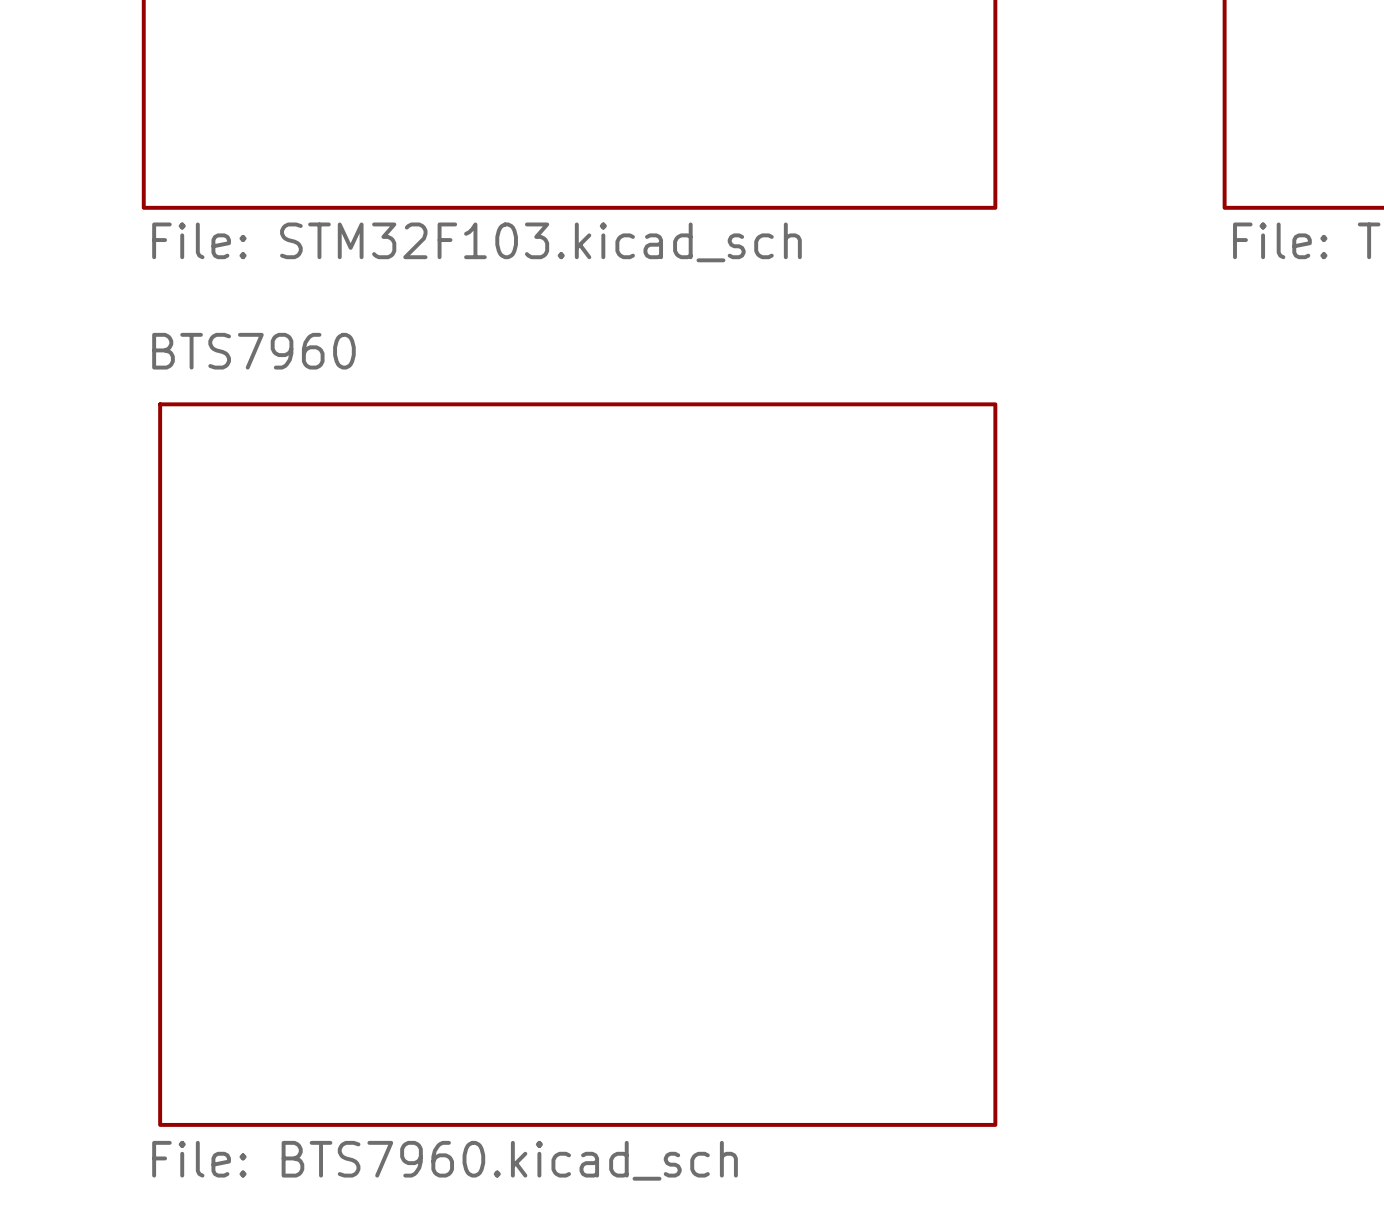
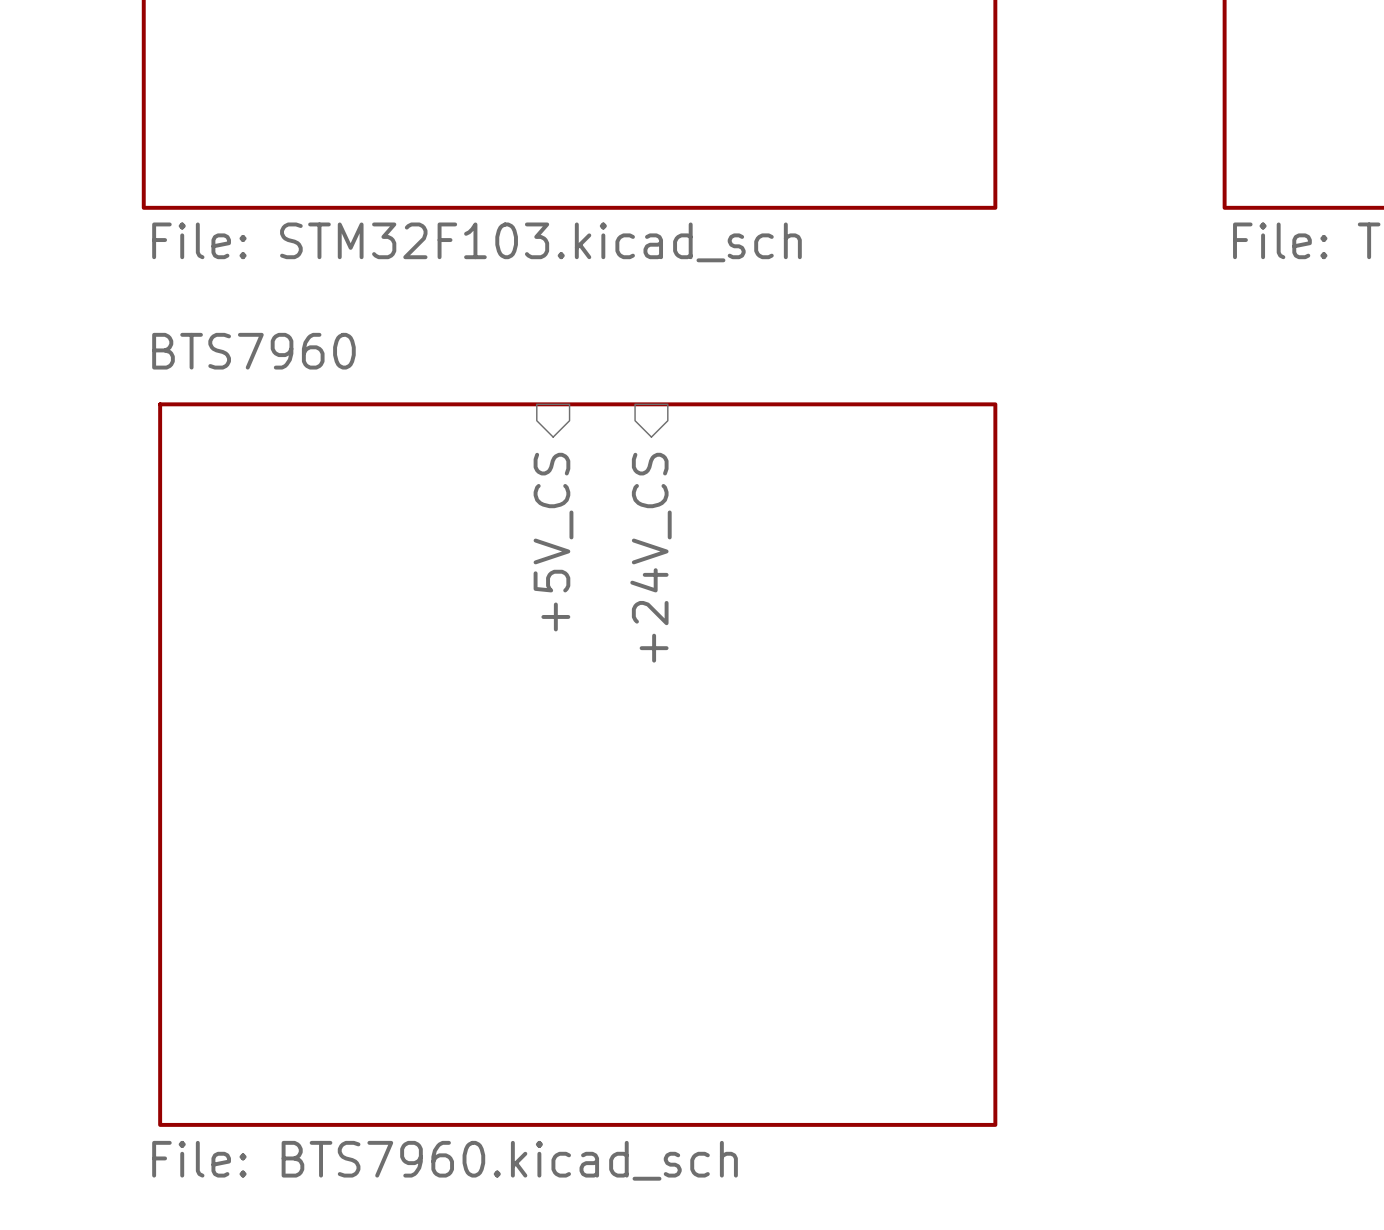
sheet pin: none -> +5V_CS (553, 542)
sheet pin: none -> +24V_CS (650, 557)

